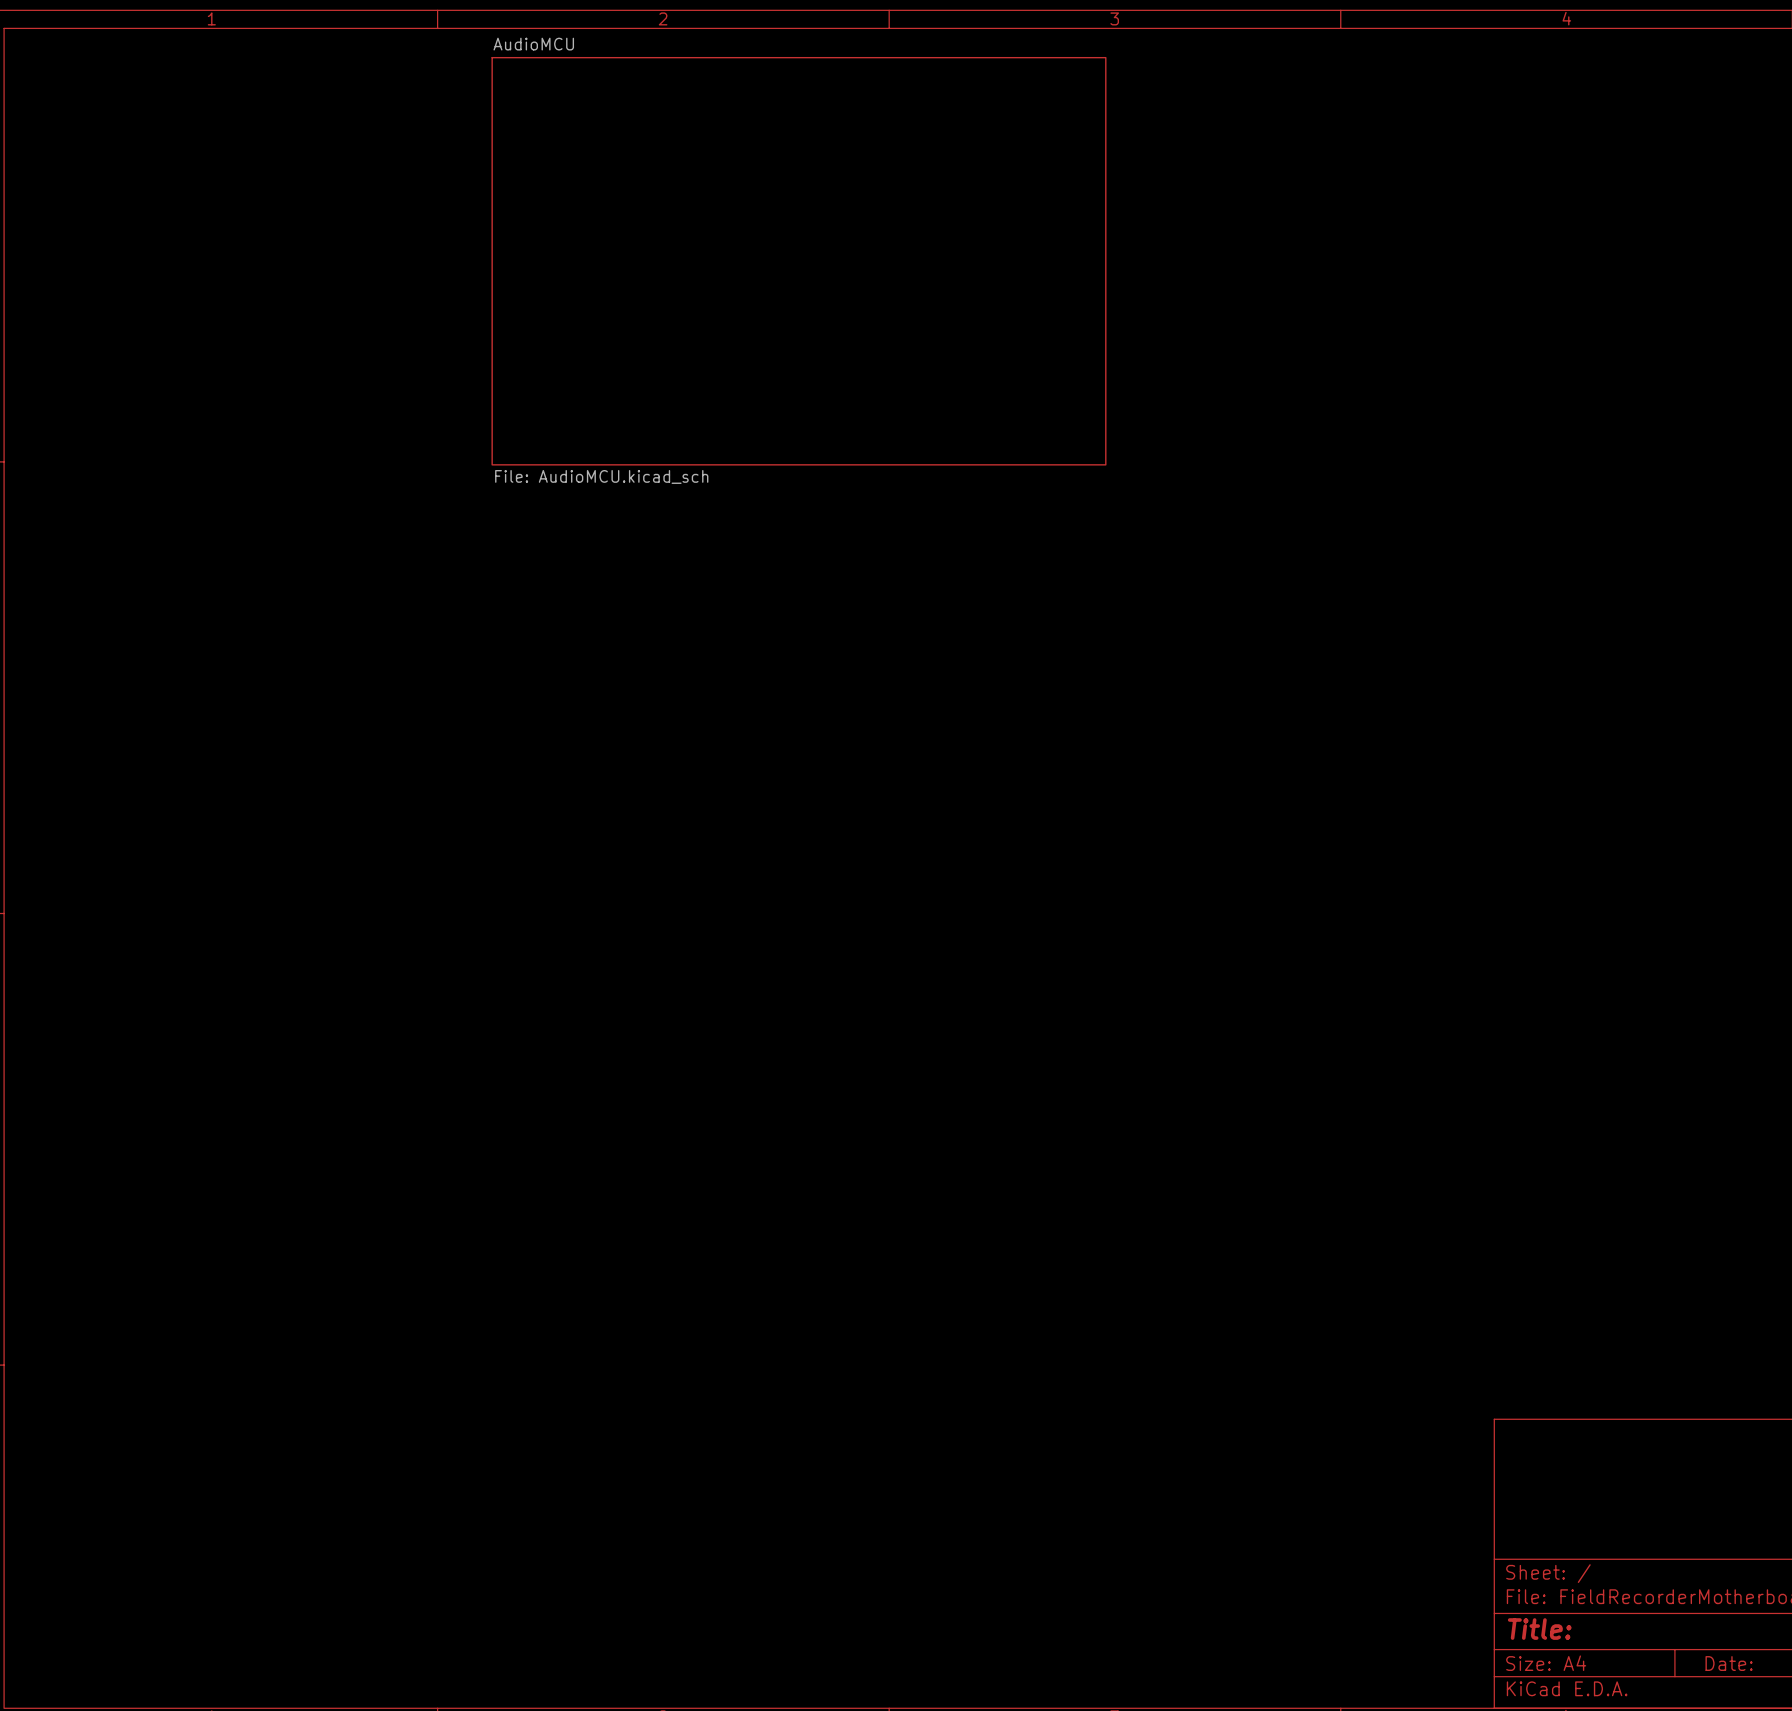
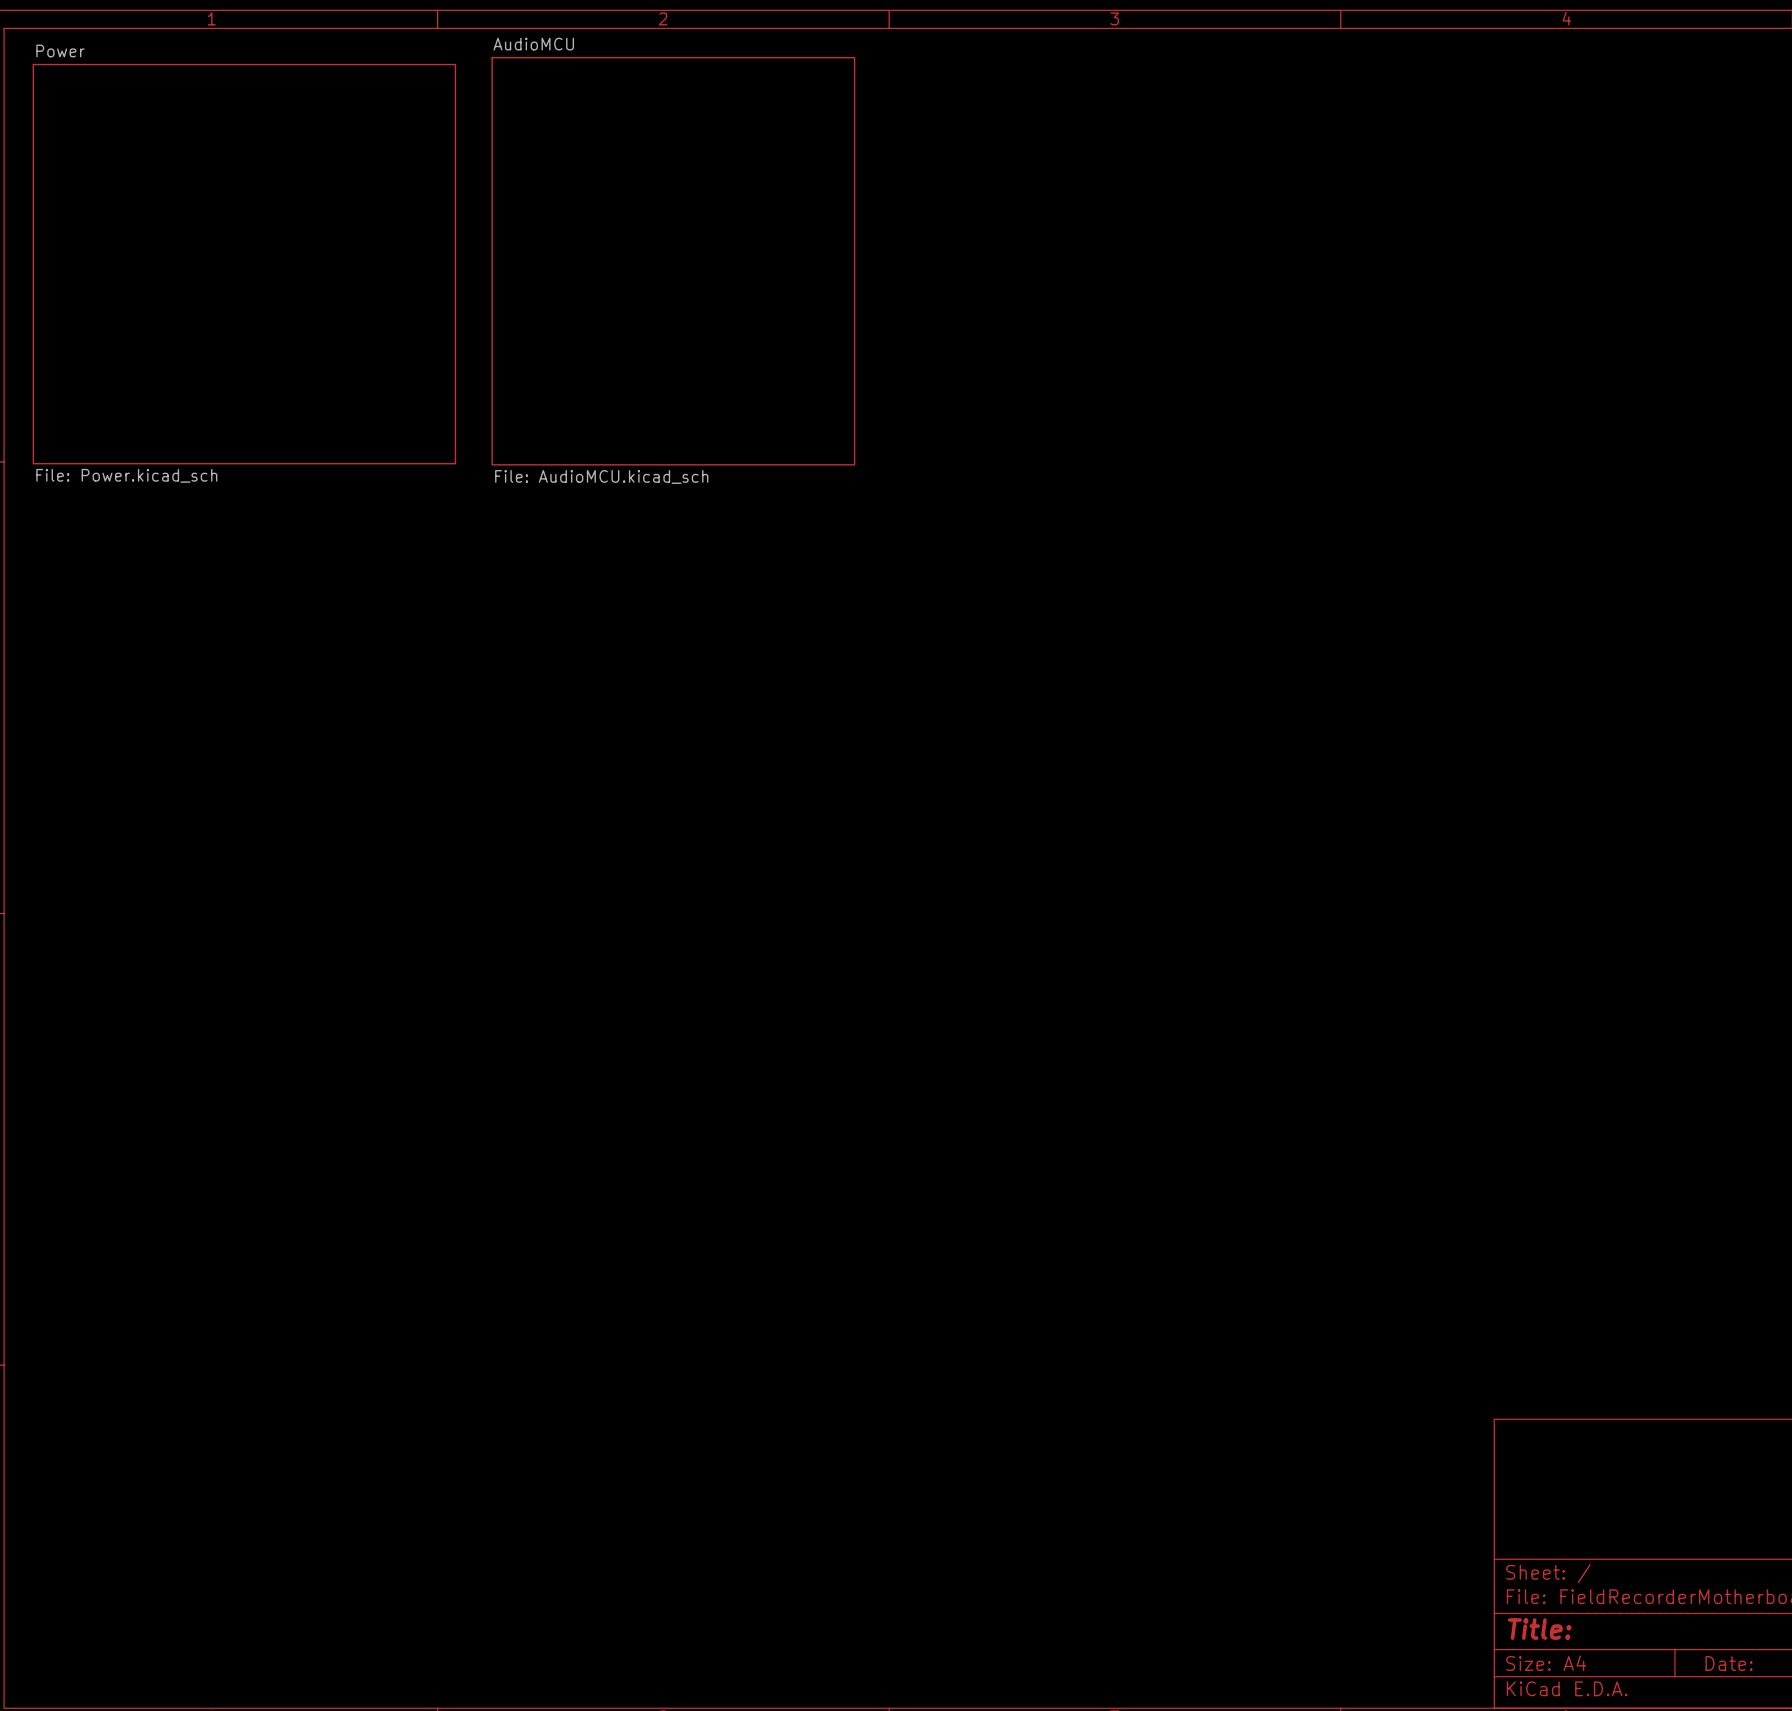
sheet AudioMCU: none -> File: AudioMCU.kicad_sch (673, 261)
sheet AudioMCU: File: AudioMCU.kicad_sch (798, 261) -> none
sheet Power: none -> File: Power.kicad_sch (244, 264)

